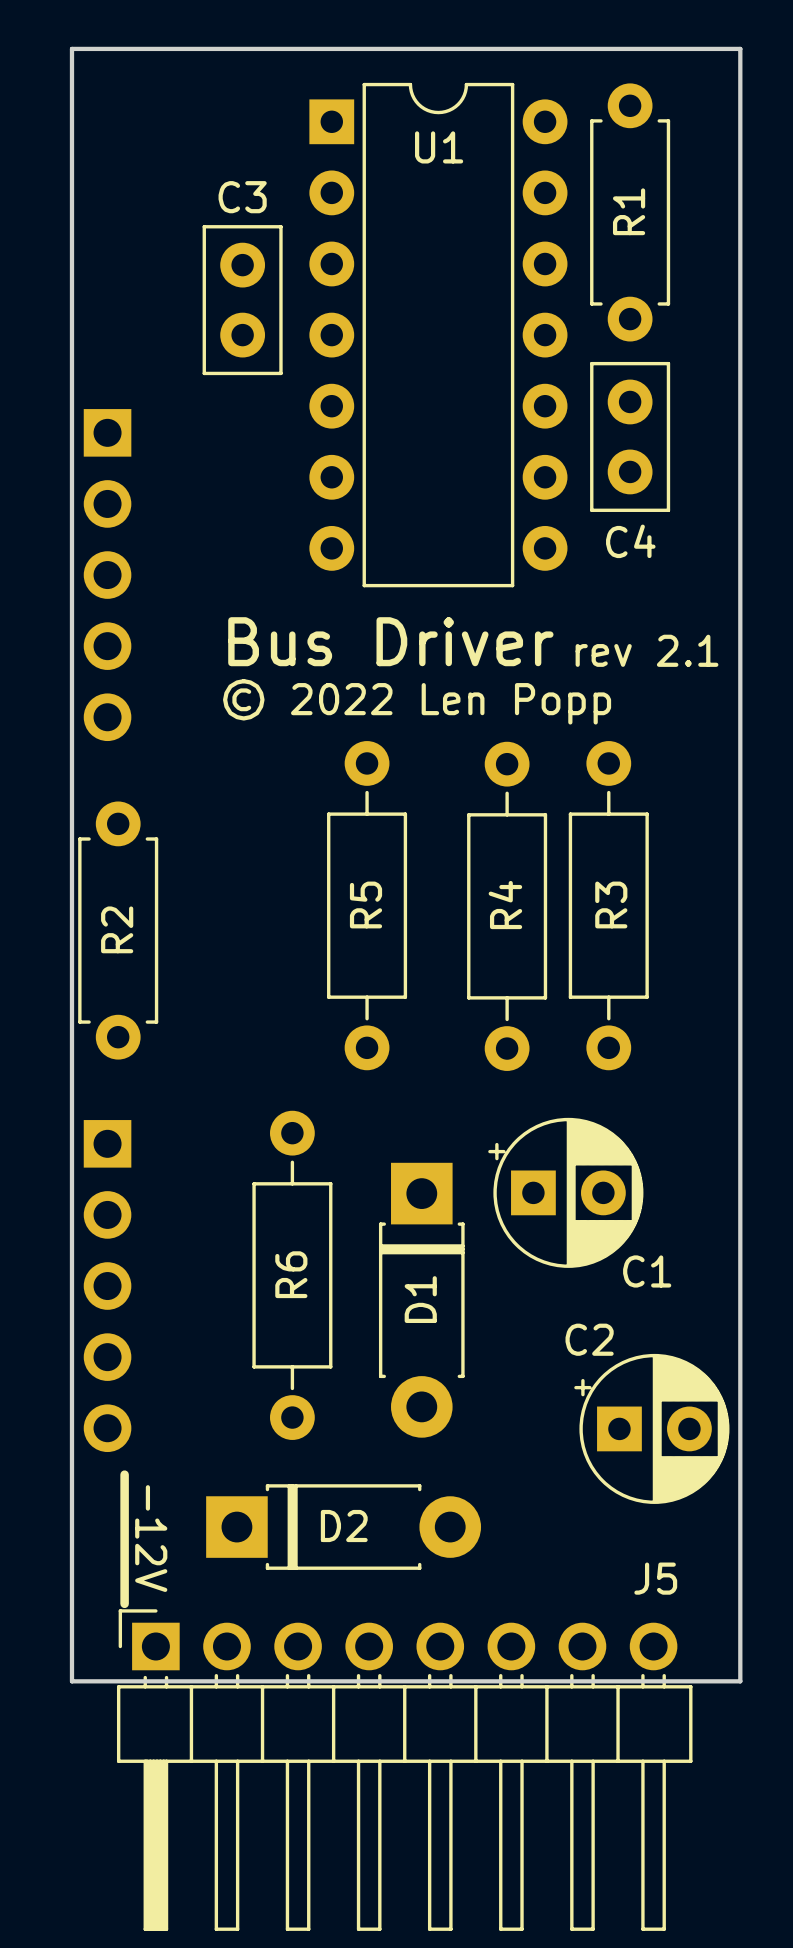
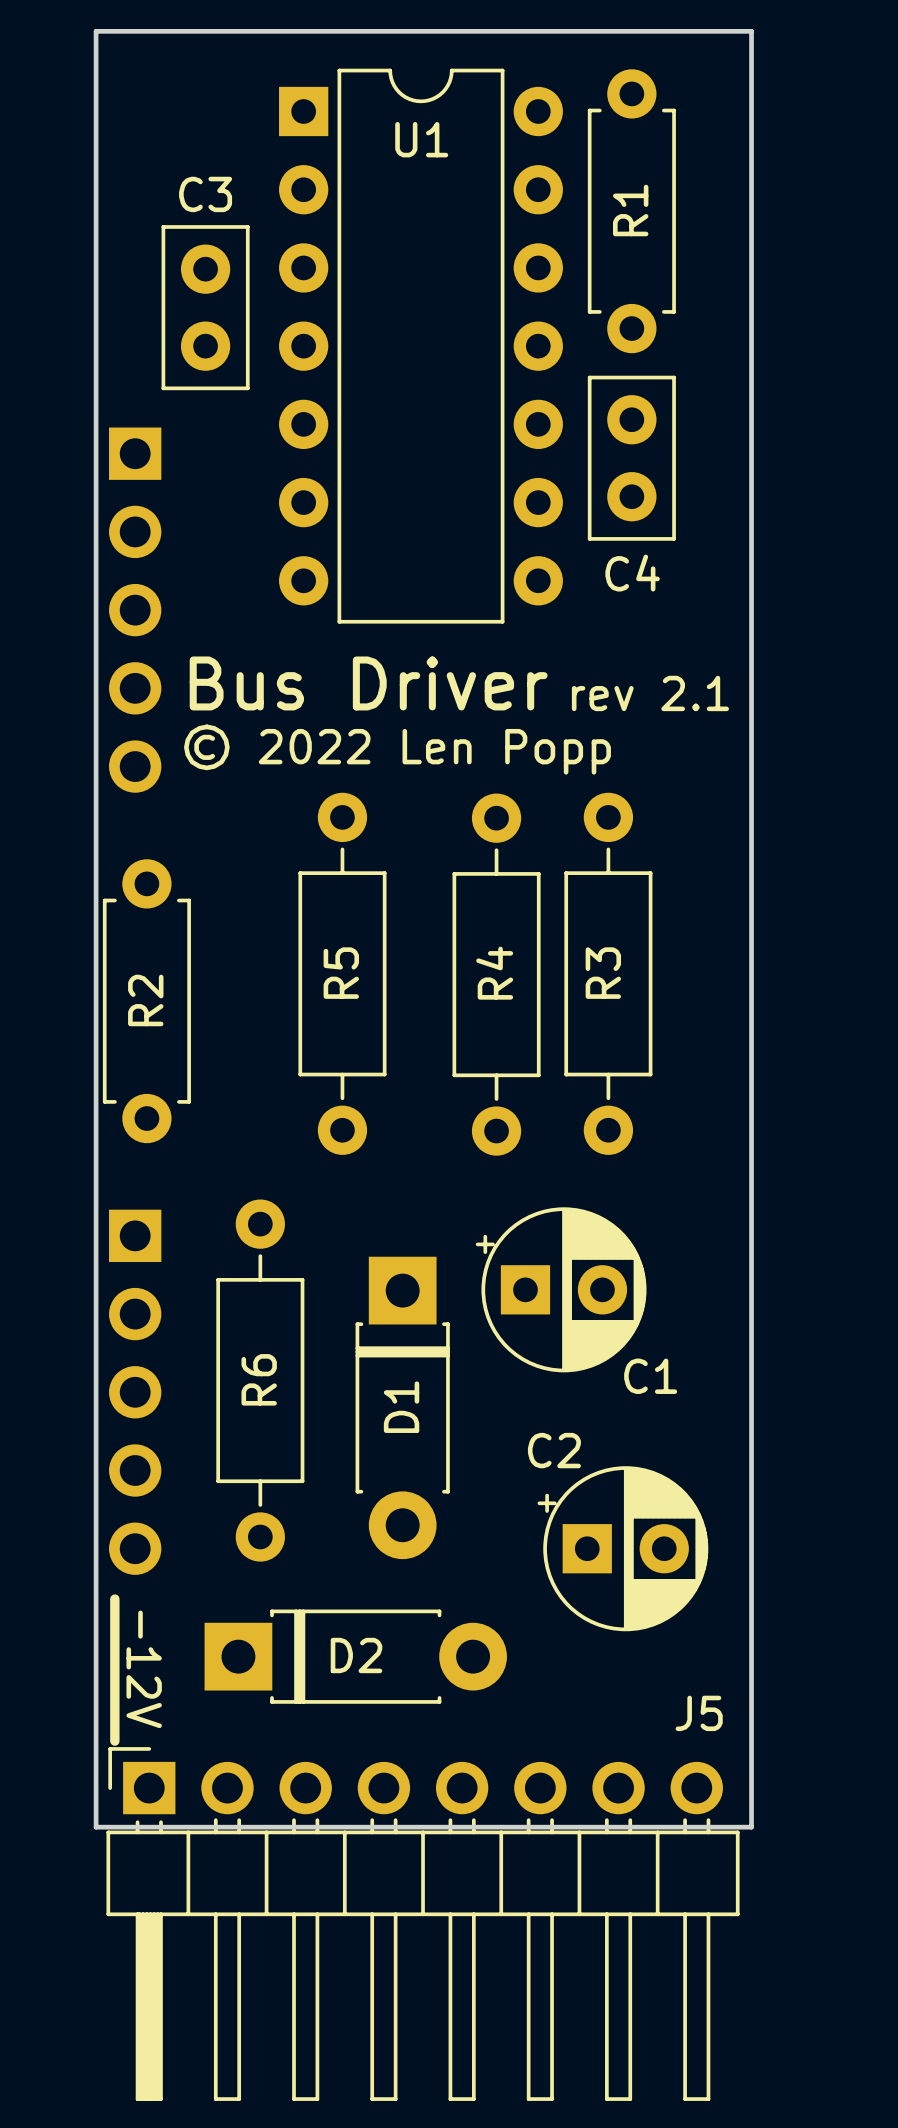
board edge: (667, 48) (740, 48) (740, 1681) (667, 1681) -> (751, 31) (751, 1827)
R1 position: (630, 212) -> (631, 211)
C3 position: (242, 300) -> (205, 307)
U1 position: (438, 335) -> (420, 346)
C4 position: (630, 436) -> (631, 458)
text position: Bus Driver (390, 641) -> Bus Driver (368, 683)
text position: rev 2.1 (647, 650) -> rev 2.1 (650, 693)
text position: © 2022 Len Popp (417, 701) -> © 2022 Len Popp (397, 749)
R3 name position: R3 (611, 904) -> R3 (603, 973)
R5 position: (367, 905) -> (342, 973)
R3 position: (608, 905) -> (608, 973)
R4 position: (507, 906) -> (496, 974)
C1 position: (565, 1192) -> (561, 1289)
R6 position: (292, 1275) -> (260, 1380)
D1 position: (421, 1300) -> (402, 1407)
C2 position: (651, 1428) -> (622, 1548)
line: (124, 1474) (124, 1603) -> (114, 1599) (114, 1741)
D2 position: (343, 1527) -> (355, 1656)
text position: -12V (151, 1538) -> -12V (144, 1669)
J5 position: (404, 1770) -> (423, 1924)

